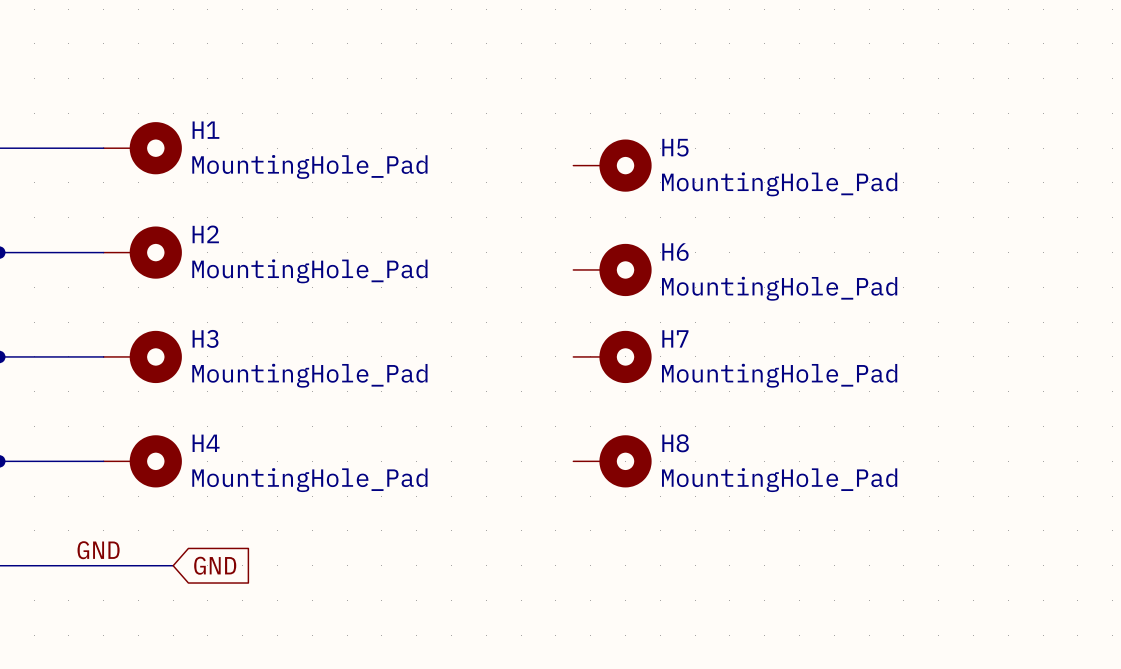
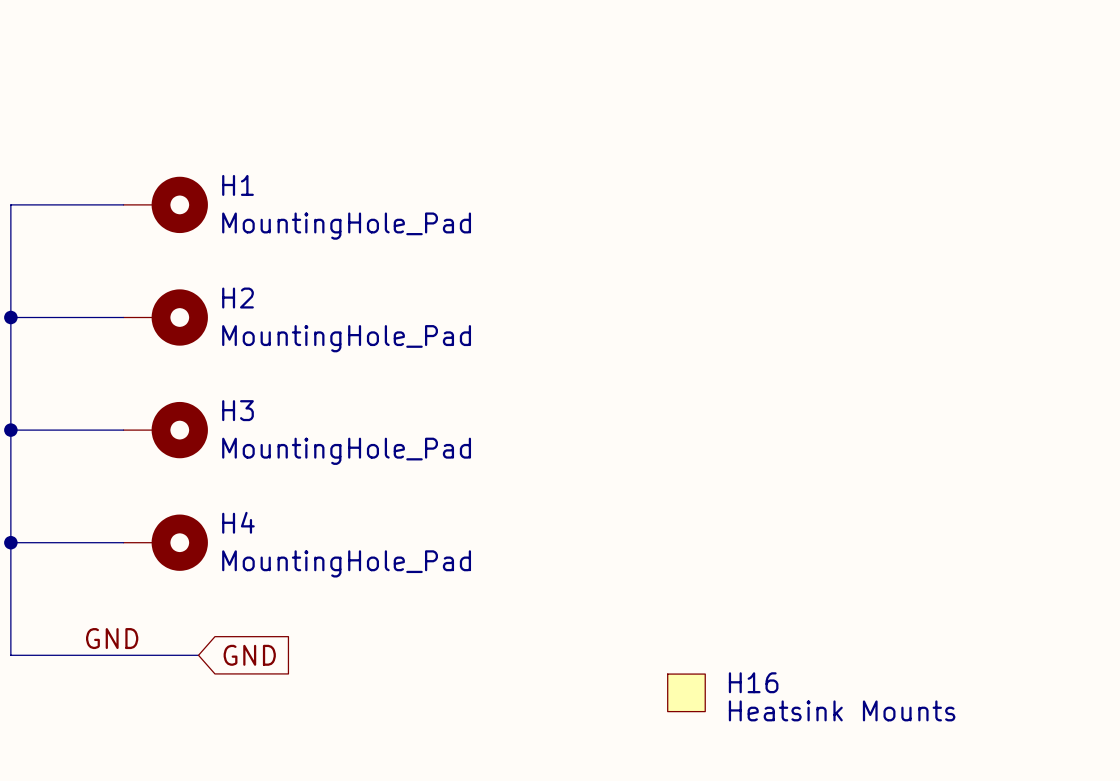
H5: MountingHole_Pad (612, 165) -> none
H6: MountingHole_Pad (612, 269) -> none
H7: MountingHole_Pad (612, 356) -> none
H8: MountingHole_Pad (612, 461) -> none
H16: none -> Heatsink Mounts (686, 692)

